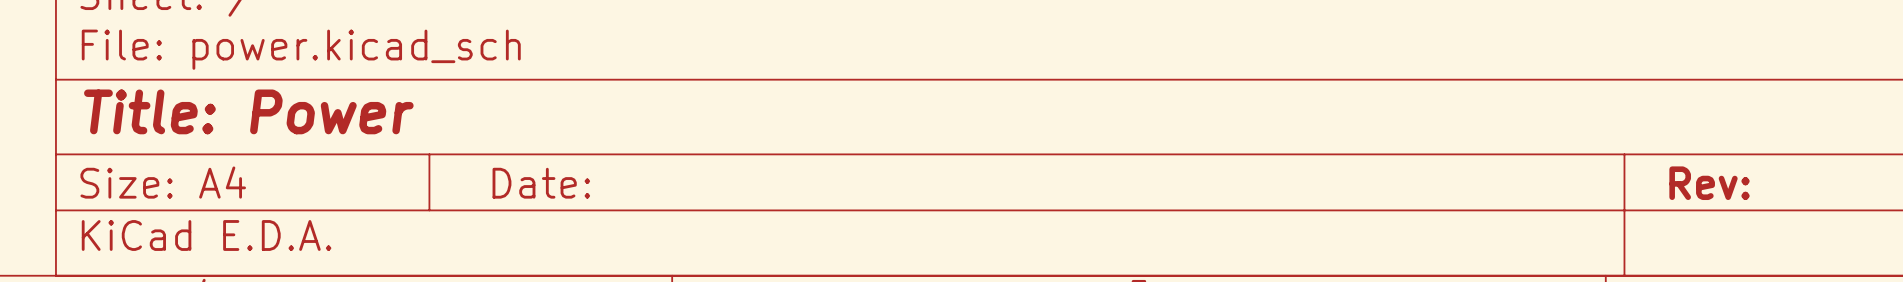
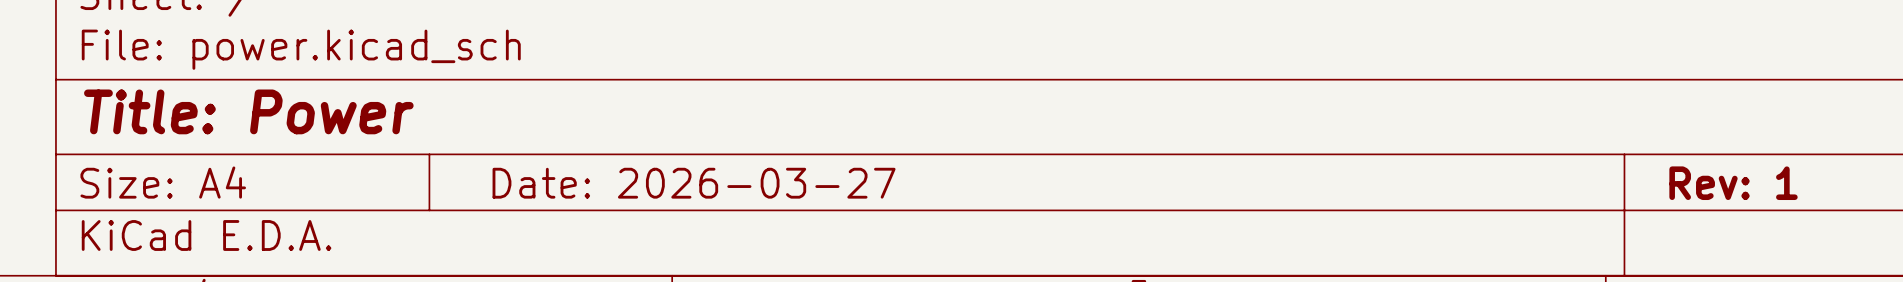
title block: Date: (541, 183) -> Date: 2026-03-27 (694, 183)
title block: Rev: (1709, 183) -> Rev: 1 (1733, 183)

